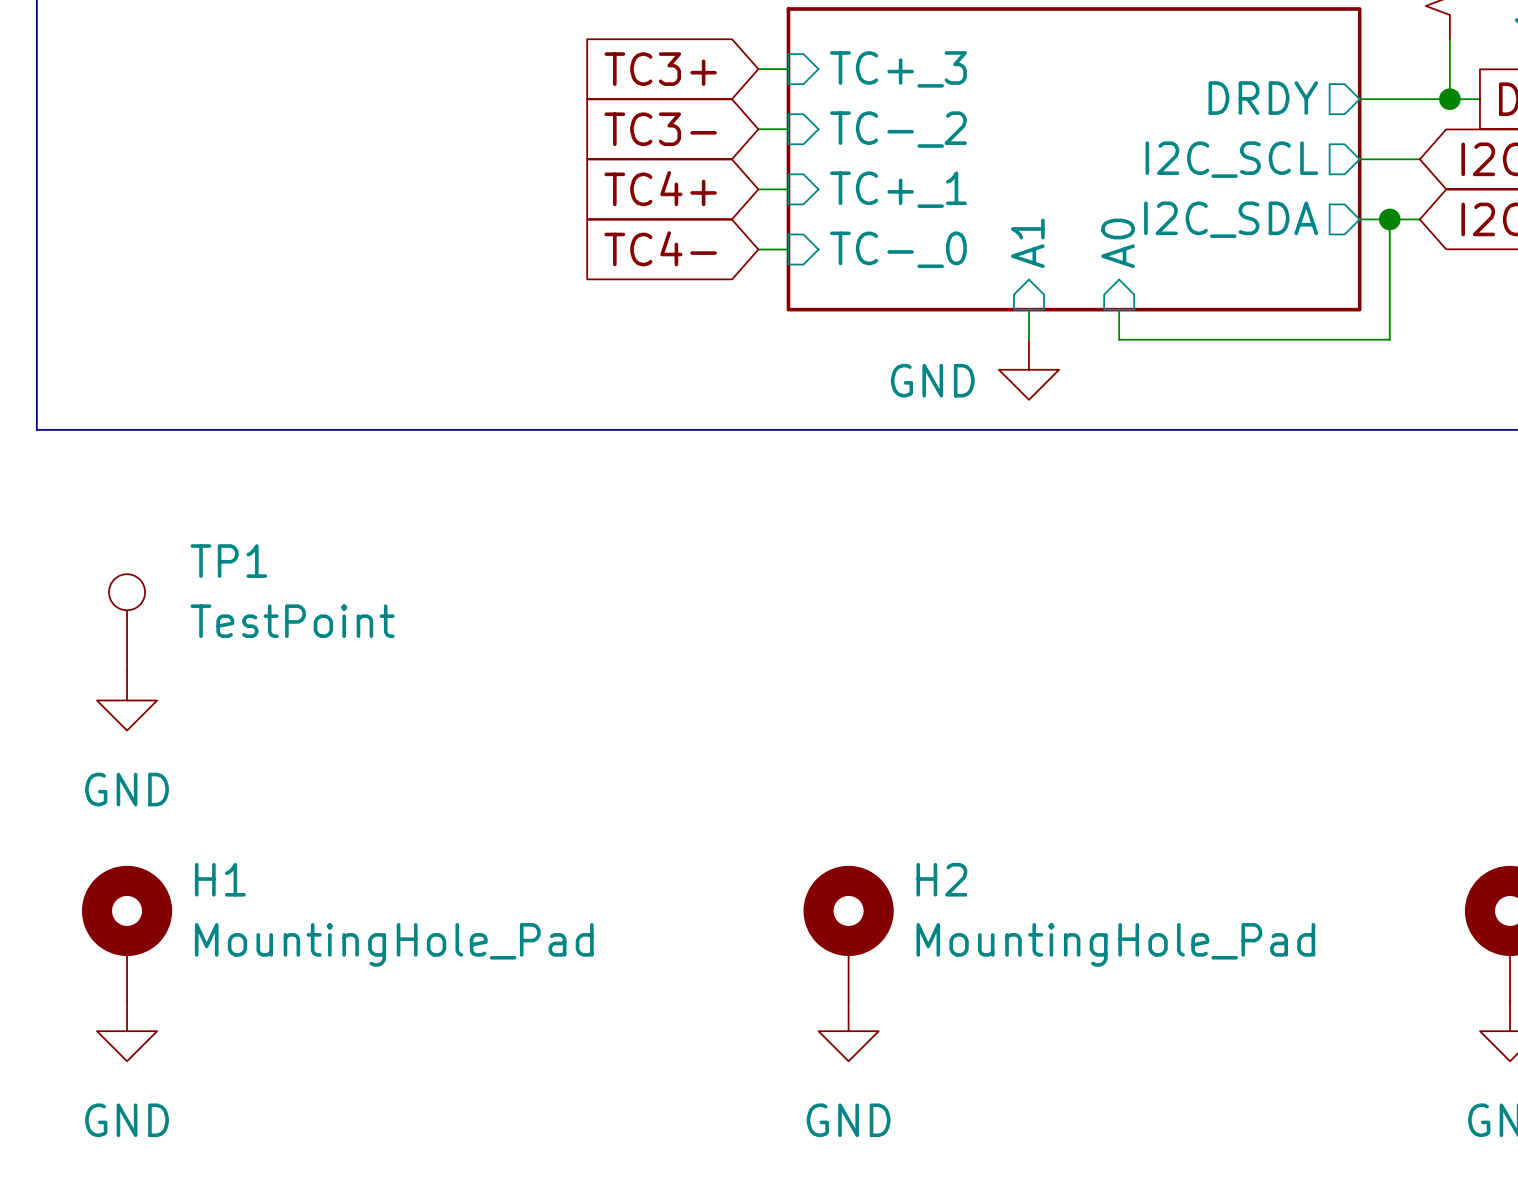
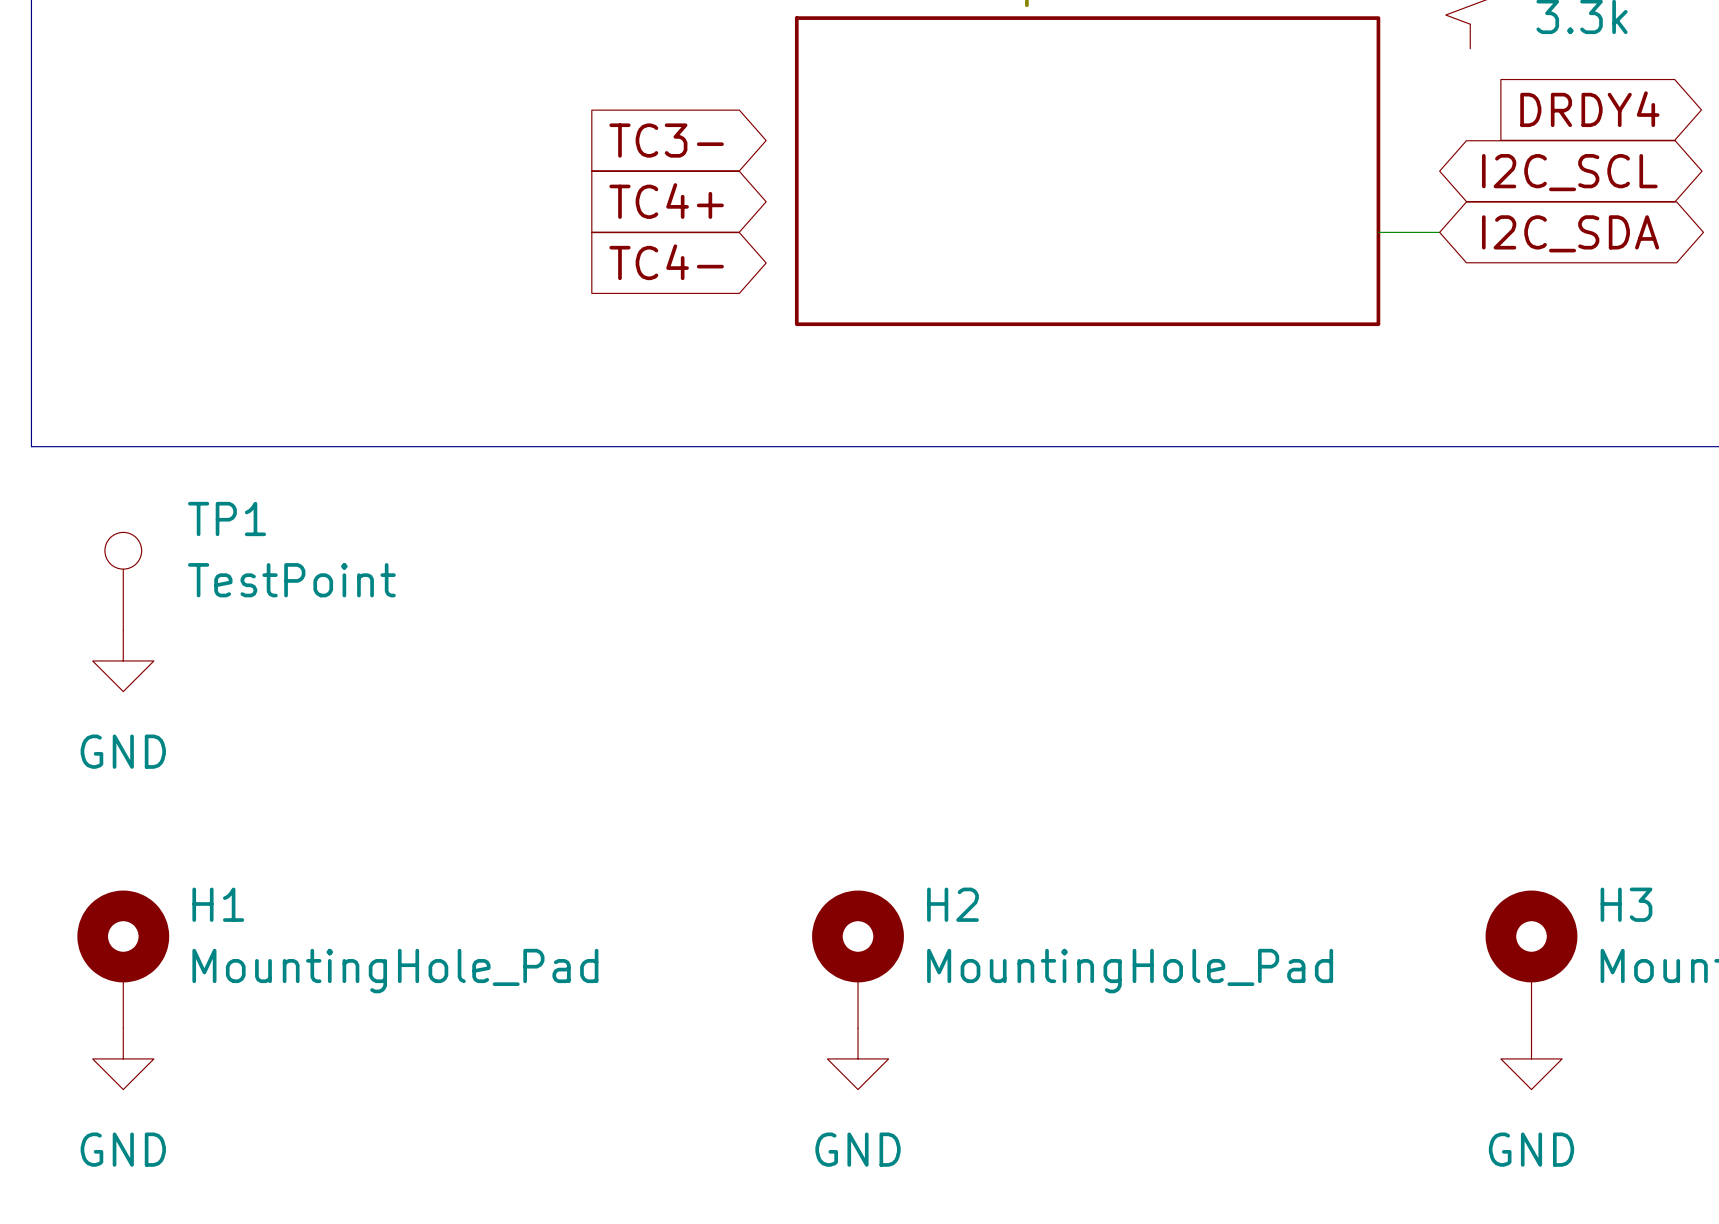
wire: (1449, 39) (1449, 99) -> none
global label: TC3+ (660, 69) -> none
wire: (758, 69) (788, 69) -> none
sheet pin: TC+_3 (898, 69) -> none
sheet pin: DRDY (1263, 98) -> none
wire: (1359, 99) (1479, 99) -> none
junction: (1449, 99) -> none
wire: (758, 129) (788, 129) -> none
sheet pin: TC-_2 (898, 129) -> none
sheet pin: I2C_SCL (1231, 159) -> none
wire: (1359, 159) (1419, 159) -> none
wire: (758, 189) (788, 189) -> none
sheet pin: TC+_1 (898, 189) -> none
sheet pin: I2C_SDA (1231, 219) -> none
wire: (1389, 219) (1389, 339) (1119, 339) (1119, 309) -> none
junction: (1389, 219) -> none
sheet pin: A1 (1027, 243) -> none
sheet pin: A0 (1118, 243) -> none
wire: (758, 249) (788, 249) -> none
sheet pin: TC-_0 (898, 249) -> none
wire: (1028, 309) (1028, 339) -> none
power symbol: GND (1028, 369) -> none
TP1 position: (127, 622) -> (123, 581)
power symbol position: GND (127, 700) -> GND (123, 660)

